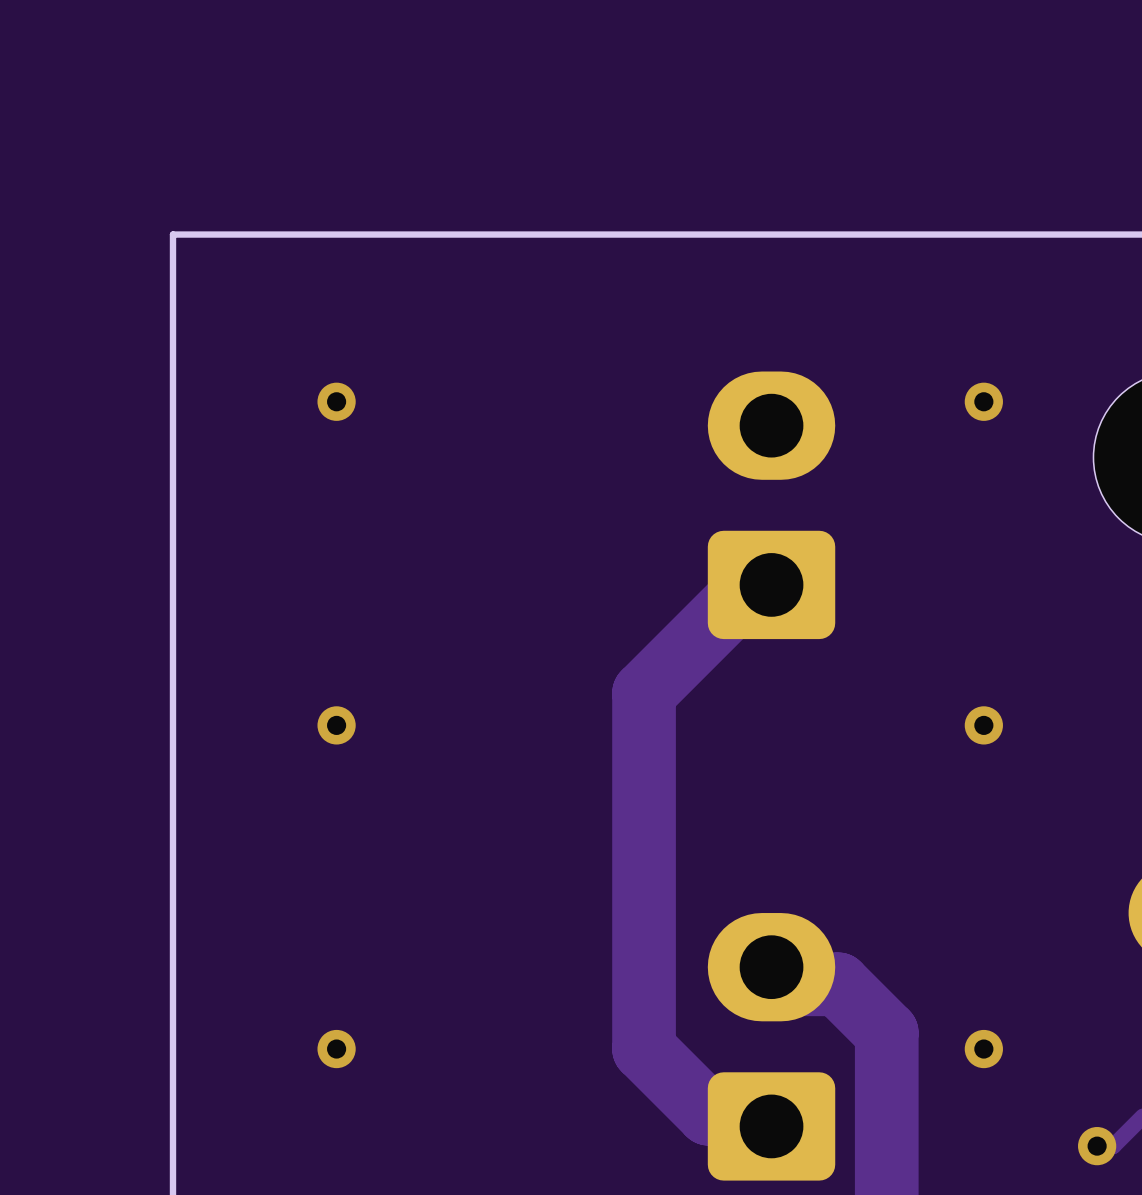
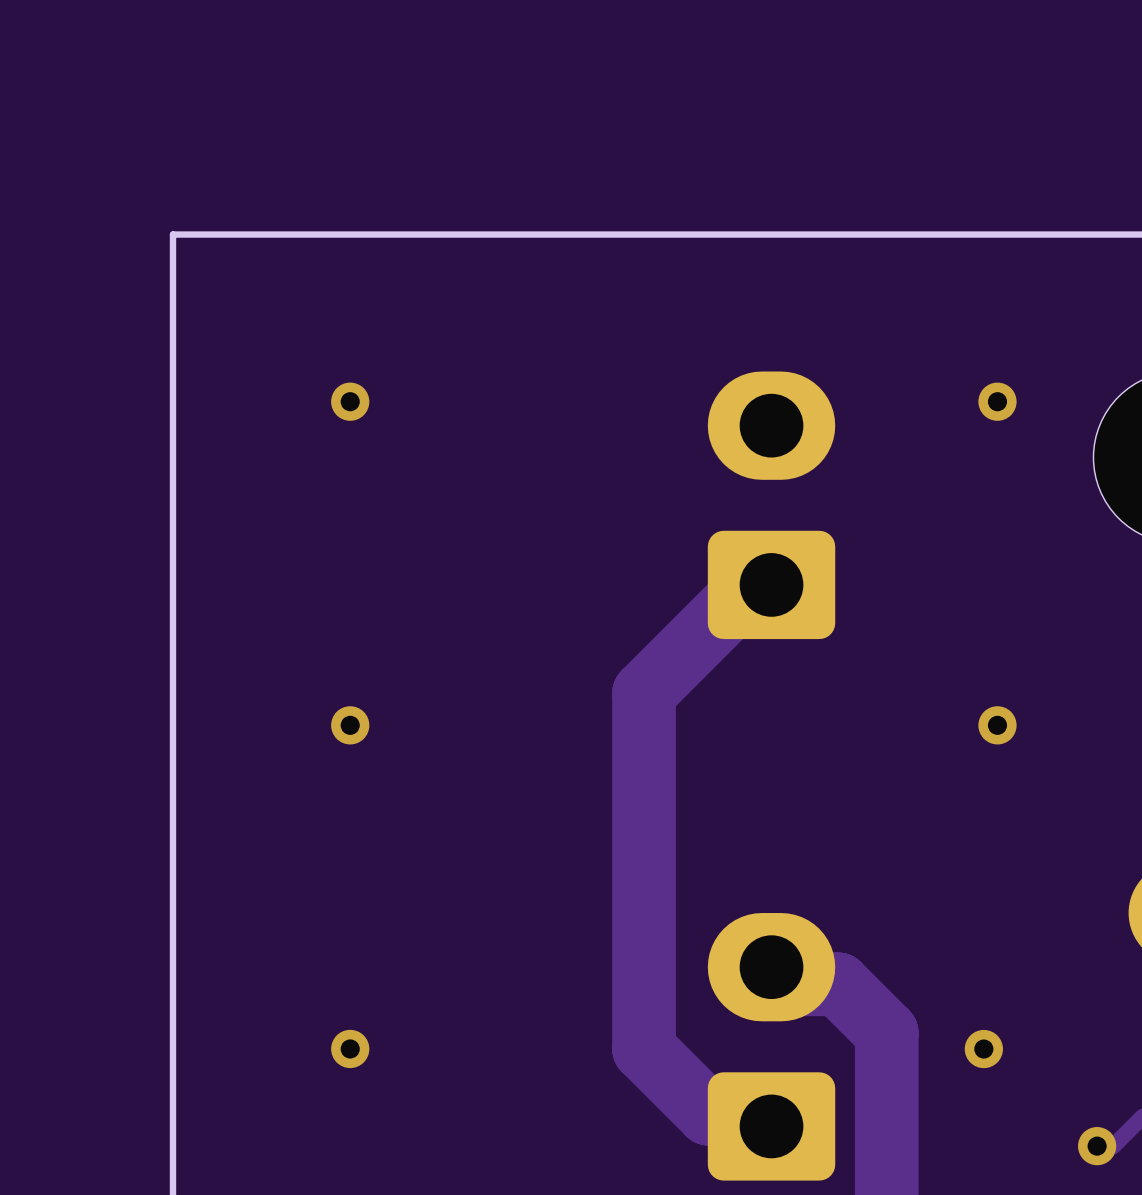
via position: (336, 401) -> (350, 401)
via position: (983, 401) -> (997, 401)
via position: (336, 725) -> (350, 725)
via position: (983, 725) -> (997, 725)
via position: (336, 1049) -> (350, 1048)

